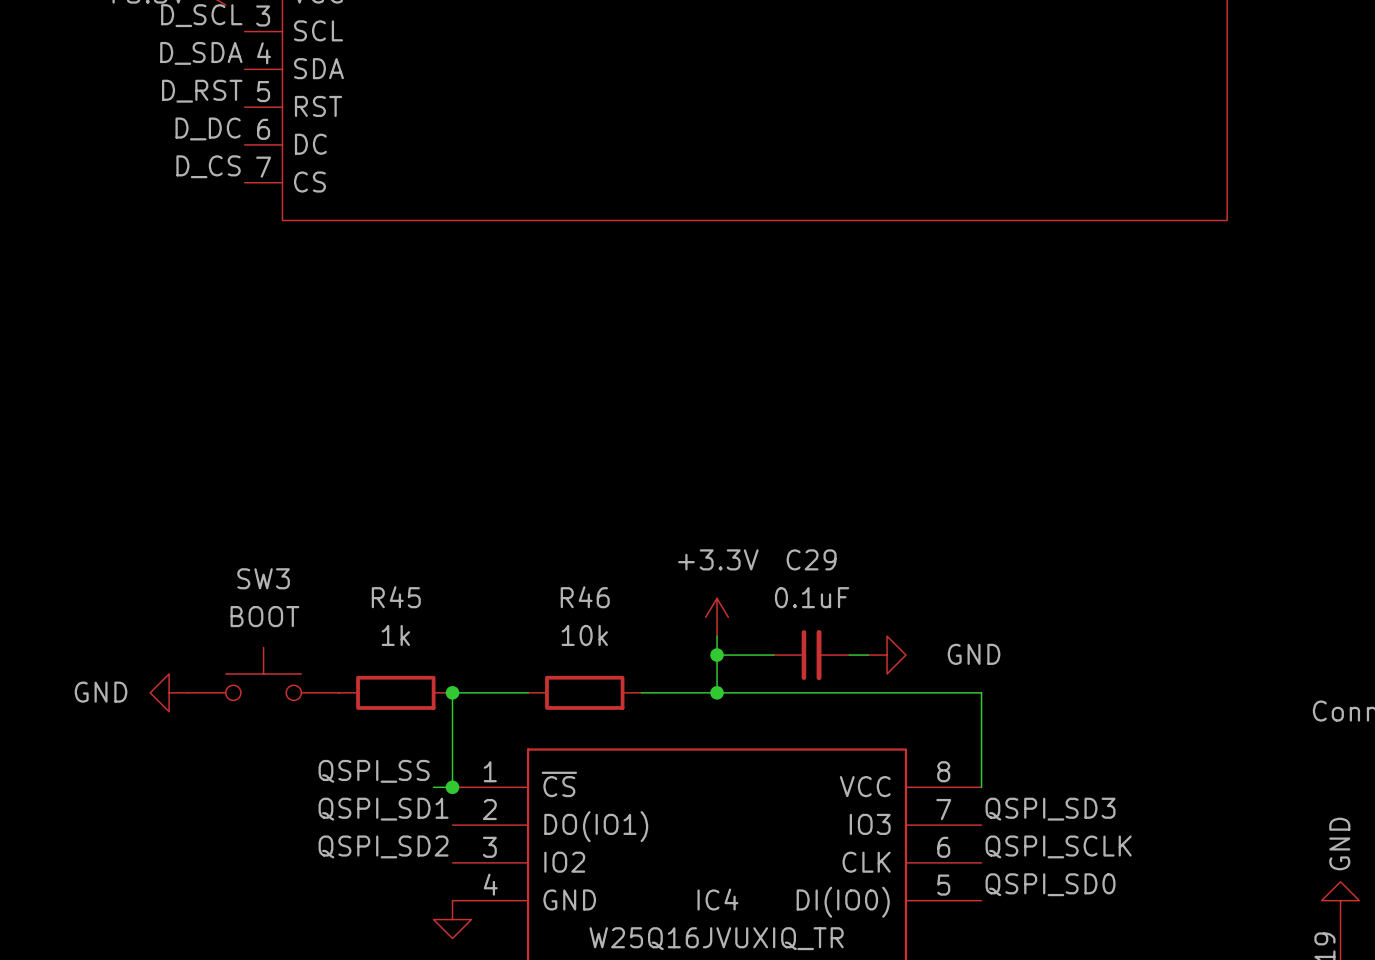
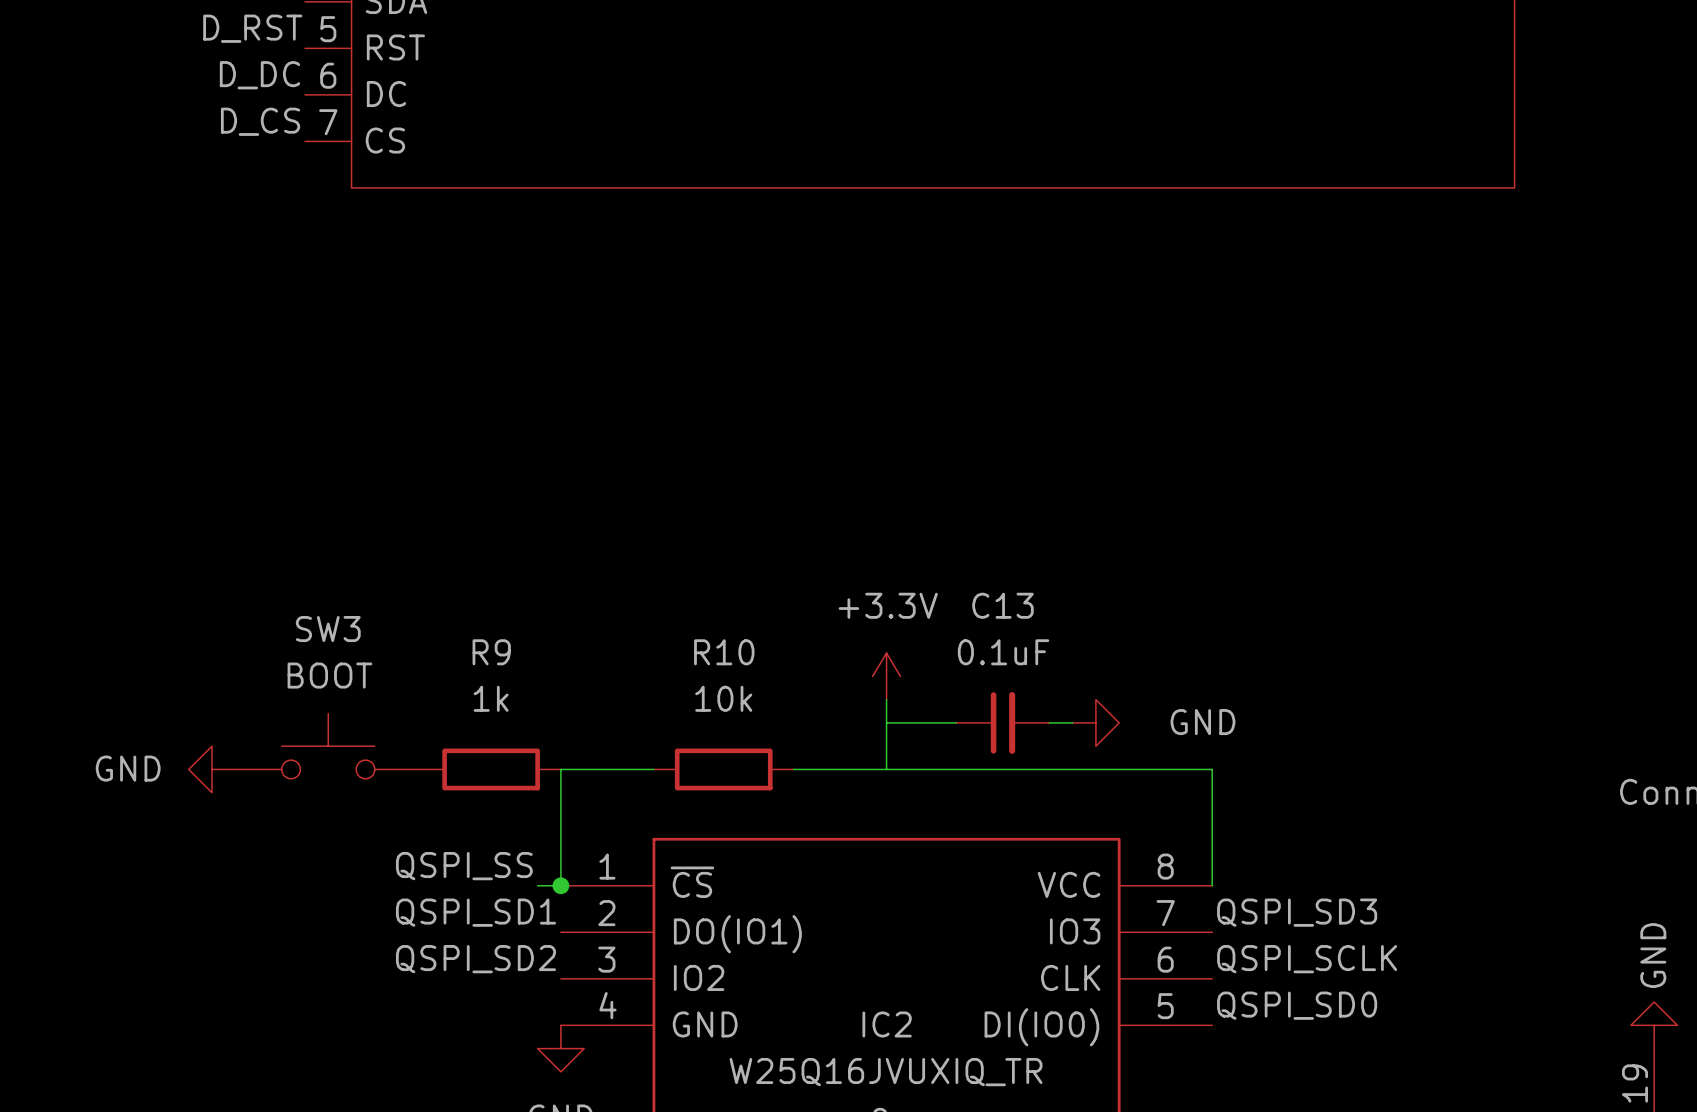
C29 name: C29 (811, 559) -> C13 (1002, 605)
R45 name: R45 (396, 597) -> R9 (491, 652)
R46 name: R46 (585, 597) -> R10 (724, 652)
junction: (717, 655) -> none
junction: (452, 692) -> none
junction: (717, 692) -> none
IC4 name: IC4 (717, 899) -> IC2 (887, 1024)

